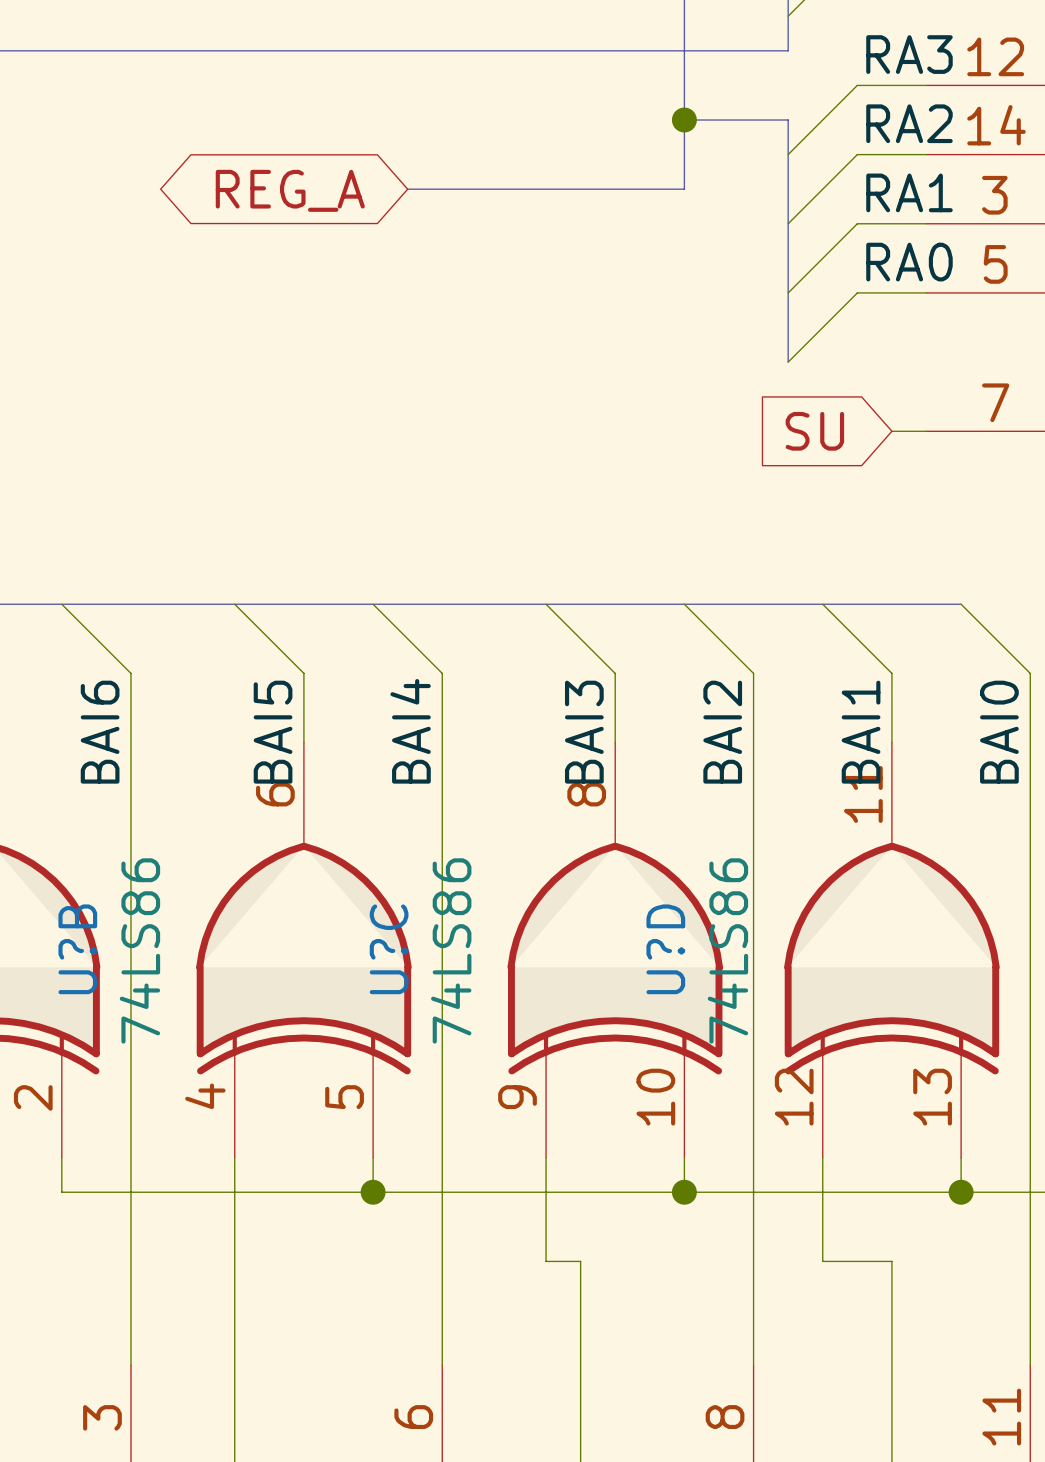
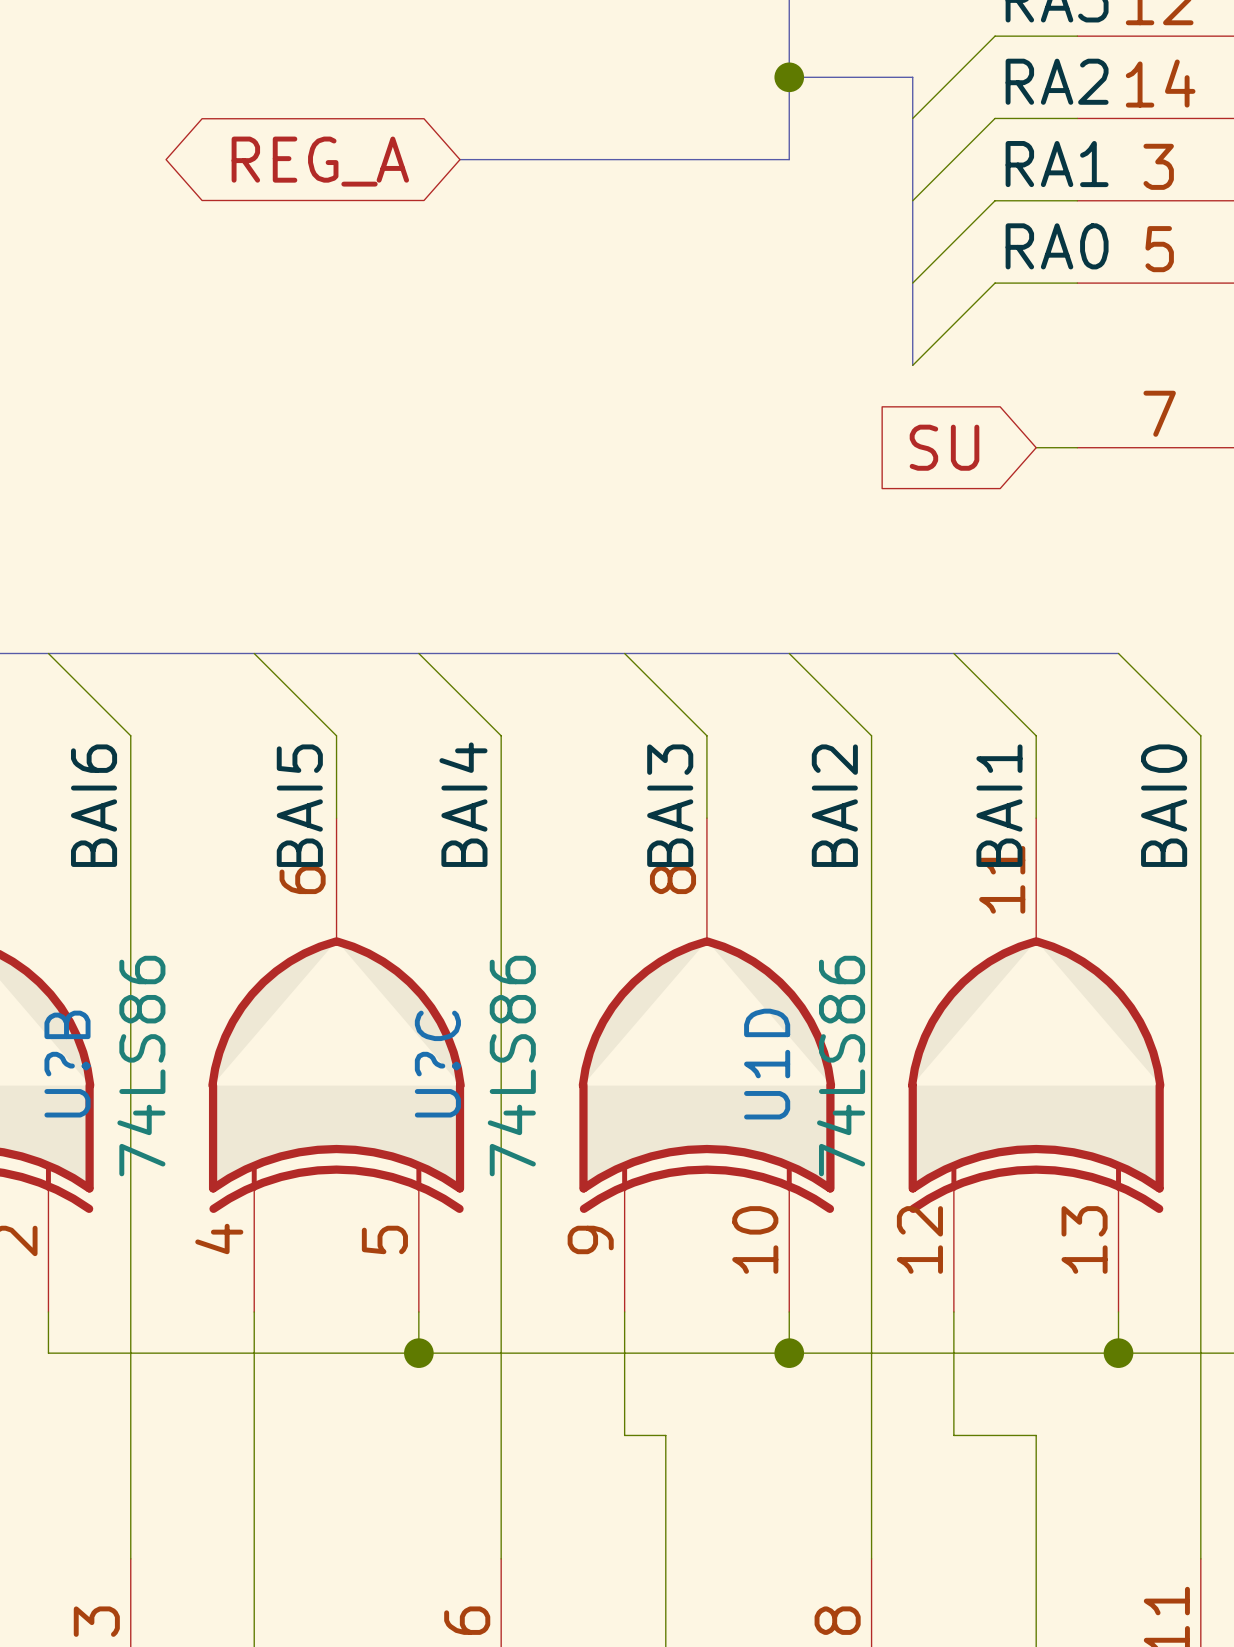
U?D name: U?D (665, 949) -> U1D (767, 1064)

